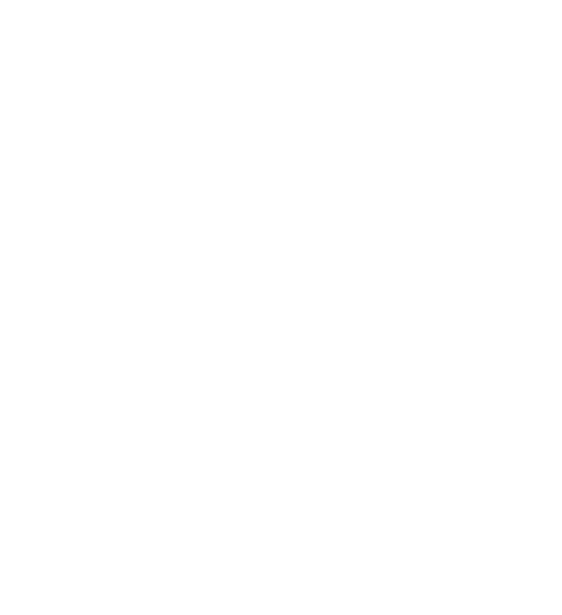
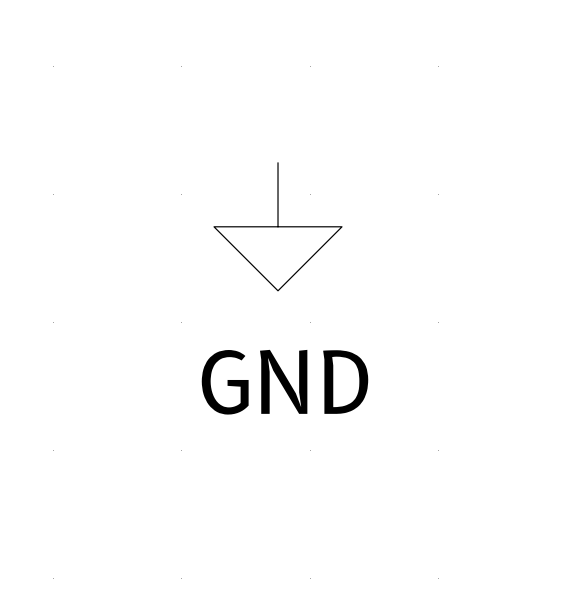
power symbol: none -> GND (278, 226)

